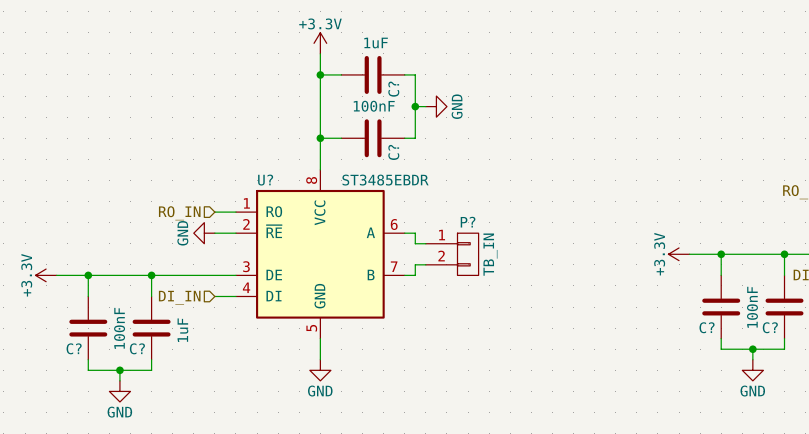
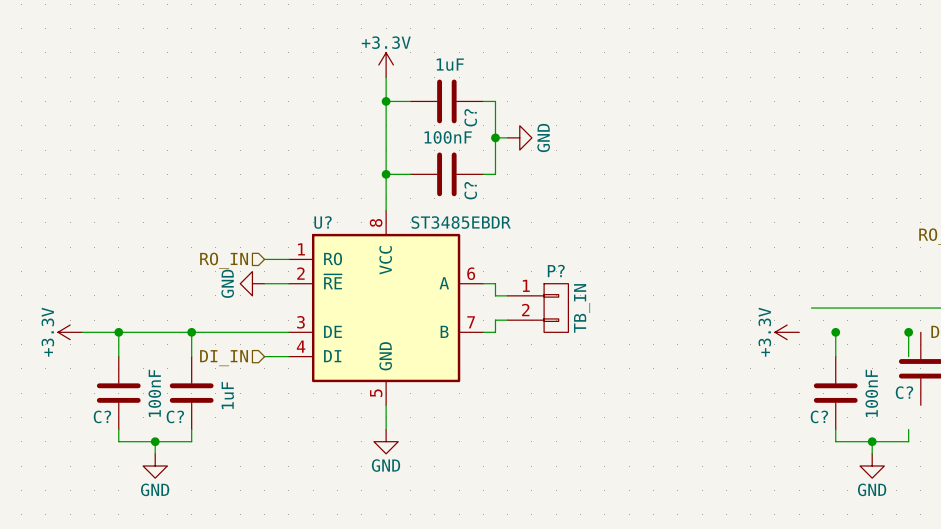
power symbol position: +3.3V (679, 254) -> +3.3V (787, 332)
wire: (721, 254) (721, 275) -> (835, 332) (835, 356)
junction position: (721, 254) -> (835, 332)
wire: (784, 254) (784, 275) -> (908, 332) (908, 356)
junction position: (784, 254) -> (908, 332)
C? position: (721, 307) -> (835, 393)
wire: (721, 338) (721, 349) (784, 349) (784, 338) -> (835, 429) (835, 441) (908, 441) (908, 429)
wire: (752, 349) (752, 359) -> (872, 441) (872, 453)
junction position: (752, 349) -> (872, 441)
power symbol position: GND (752, 370) -> GND (872, 466)

